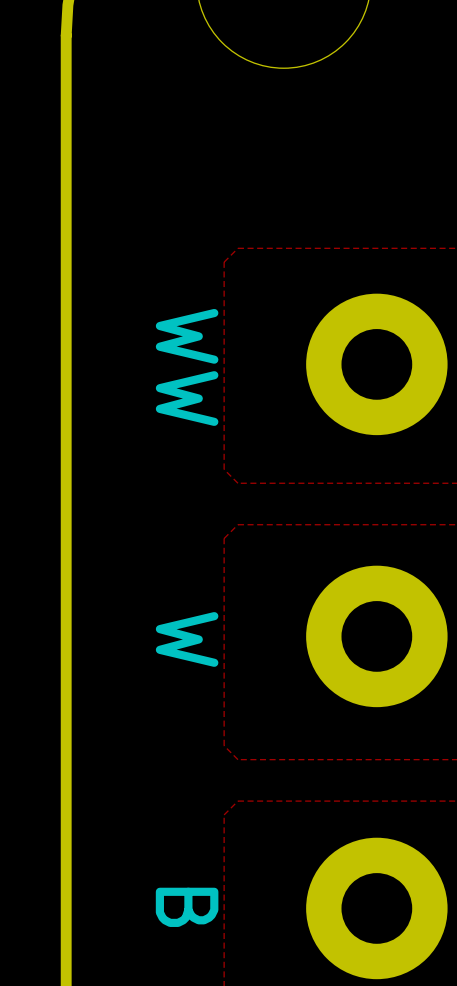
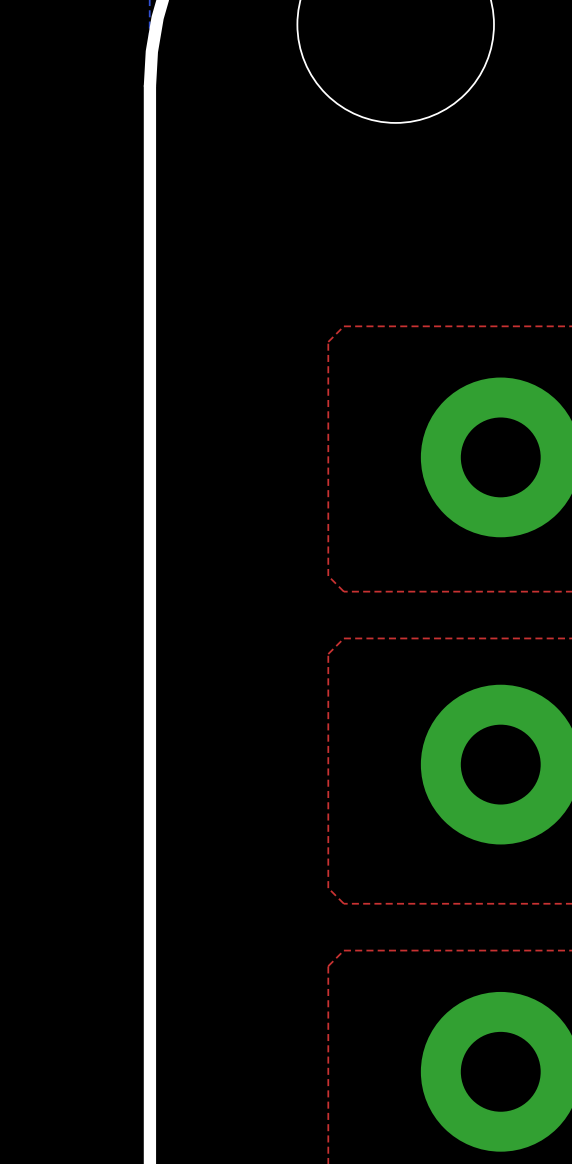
text: WW (187, 367) -> none
text: W (187, 639) -> none
text: B (187, 907) -> none

